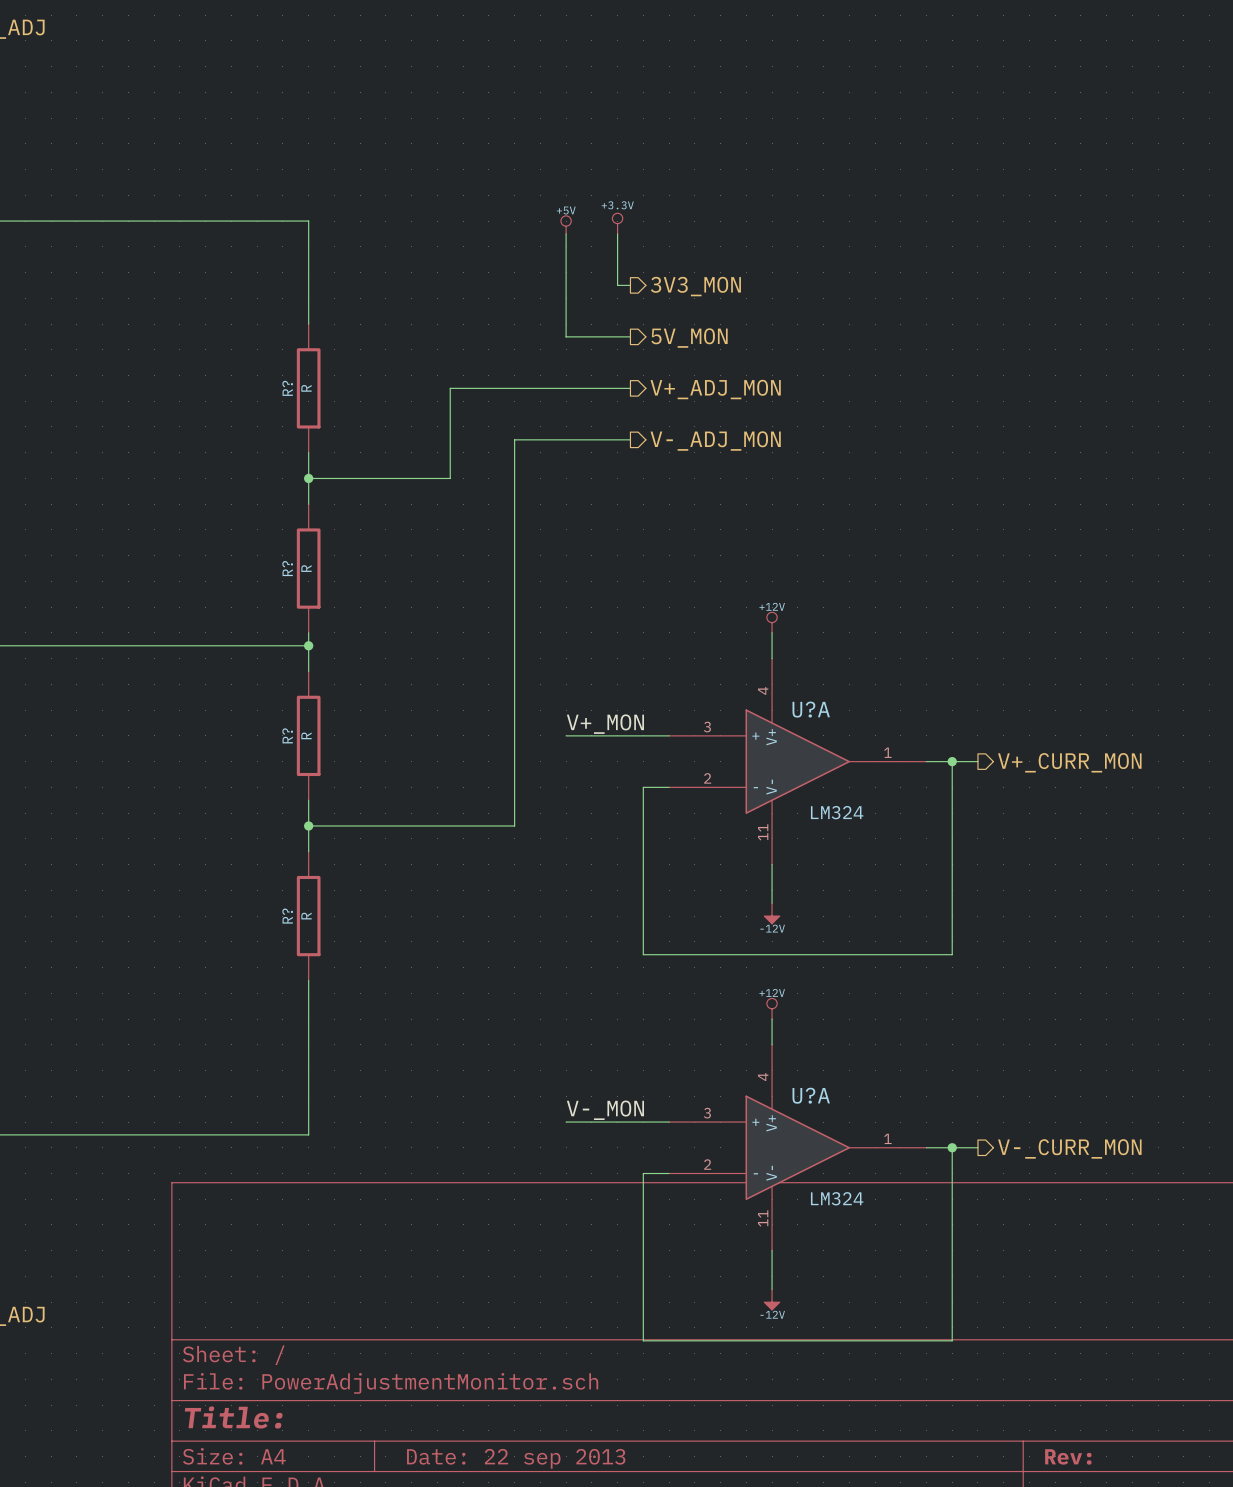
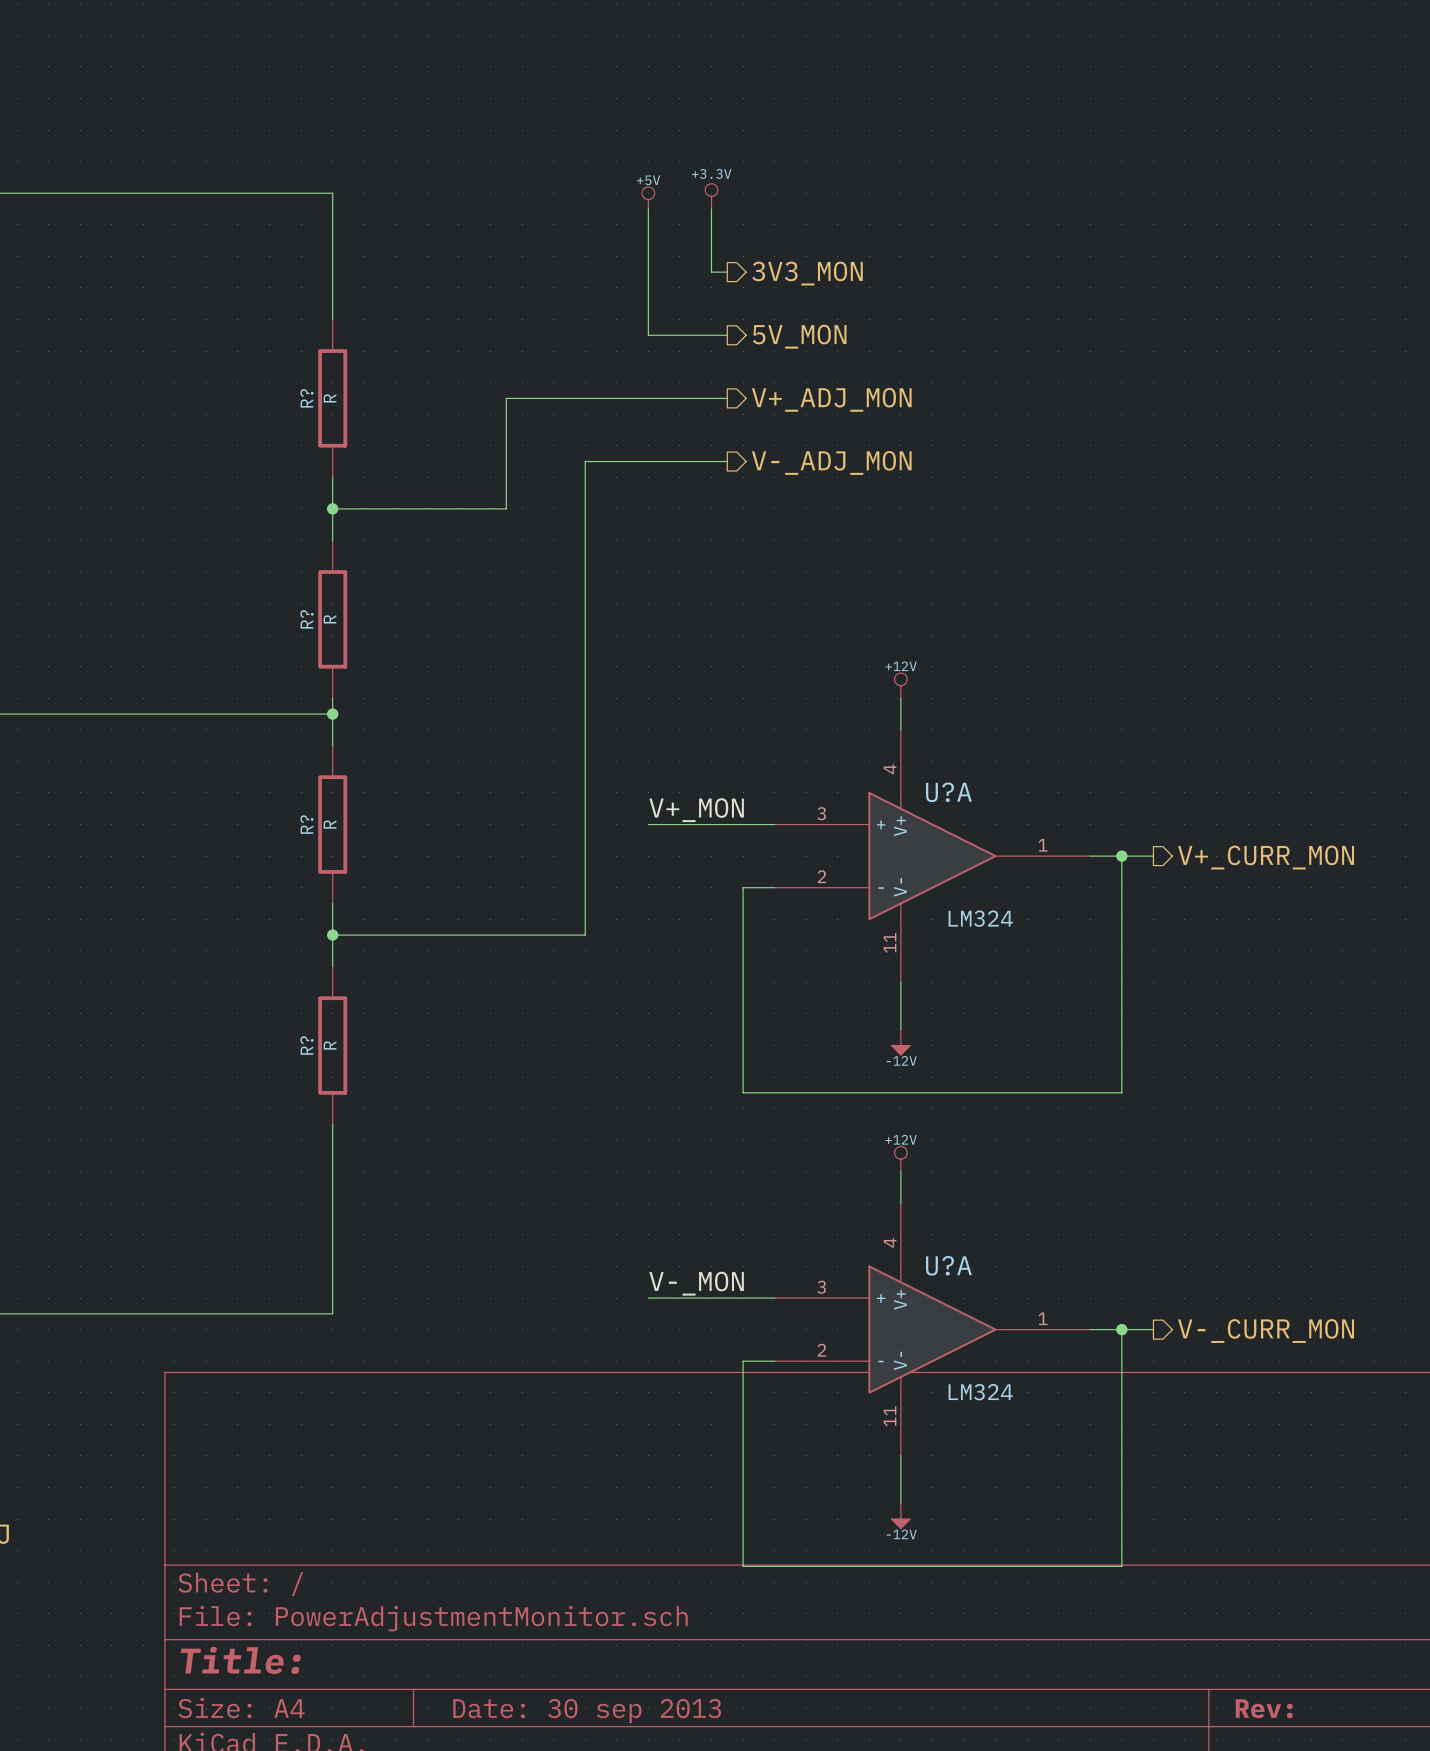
title block: Date: 22 sep 2013 (516, 1458) -> Date: 30 sep 2013 (587, 1711)

